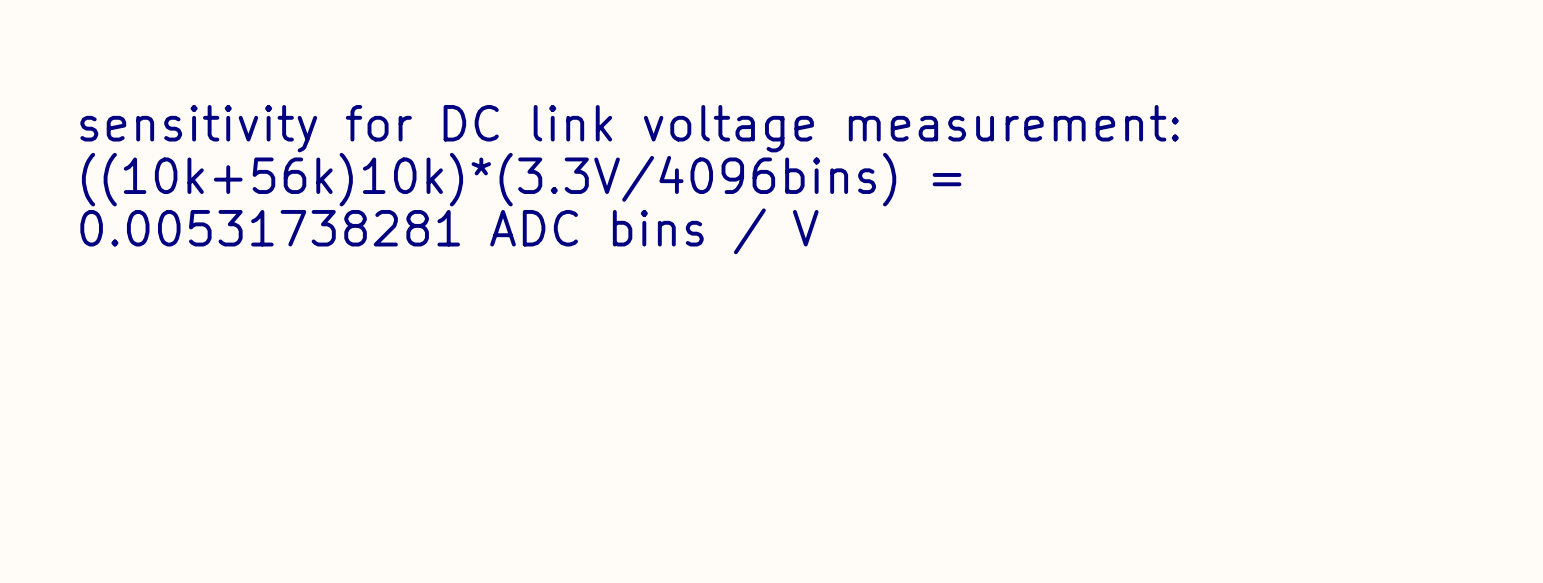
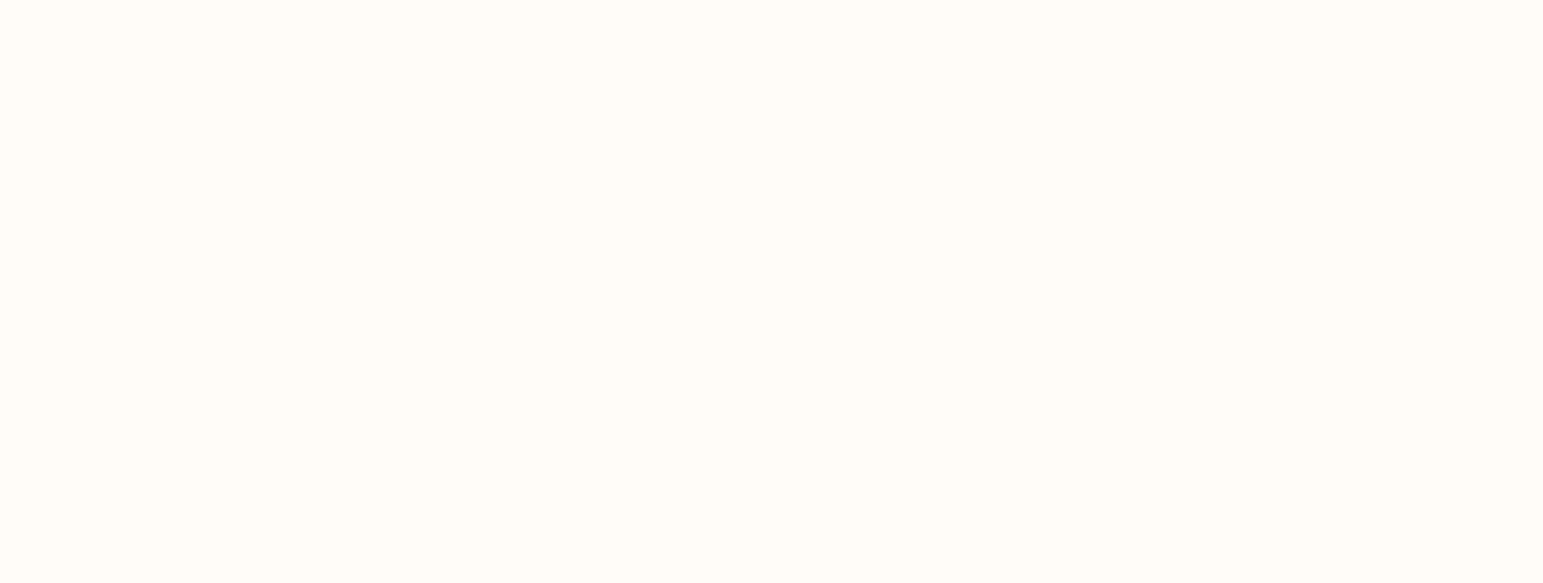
text: sensitivity for DC link voltage measurement: (629, 128) -> none
text: ((10k+56k)10k)*(3.3V/4096bins) = (521, 179) -> none
text: 0.00531738281 ADC bins / V (449, 231) -> none

